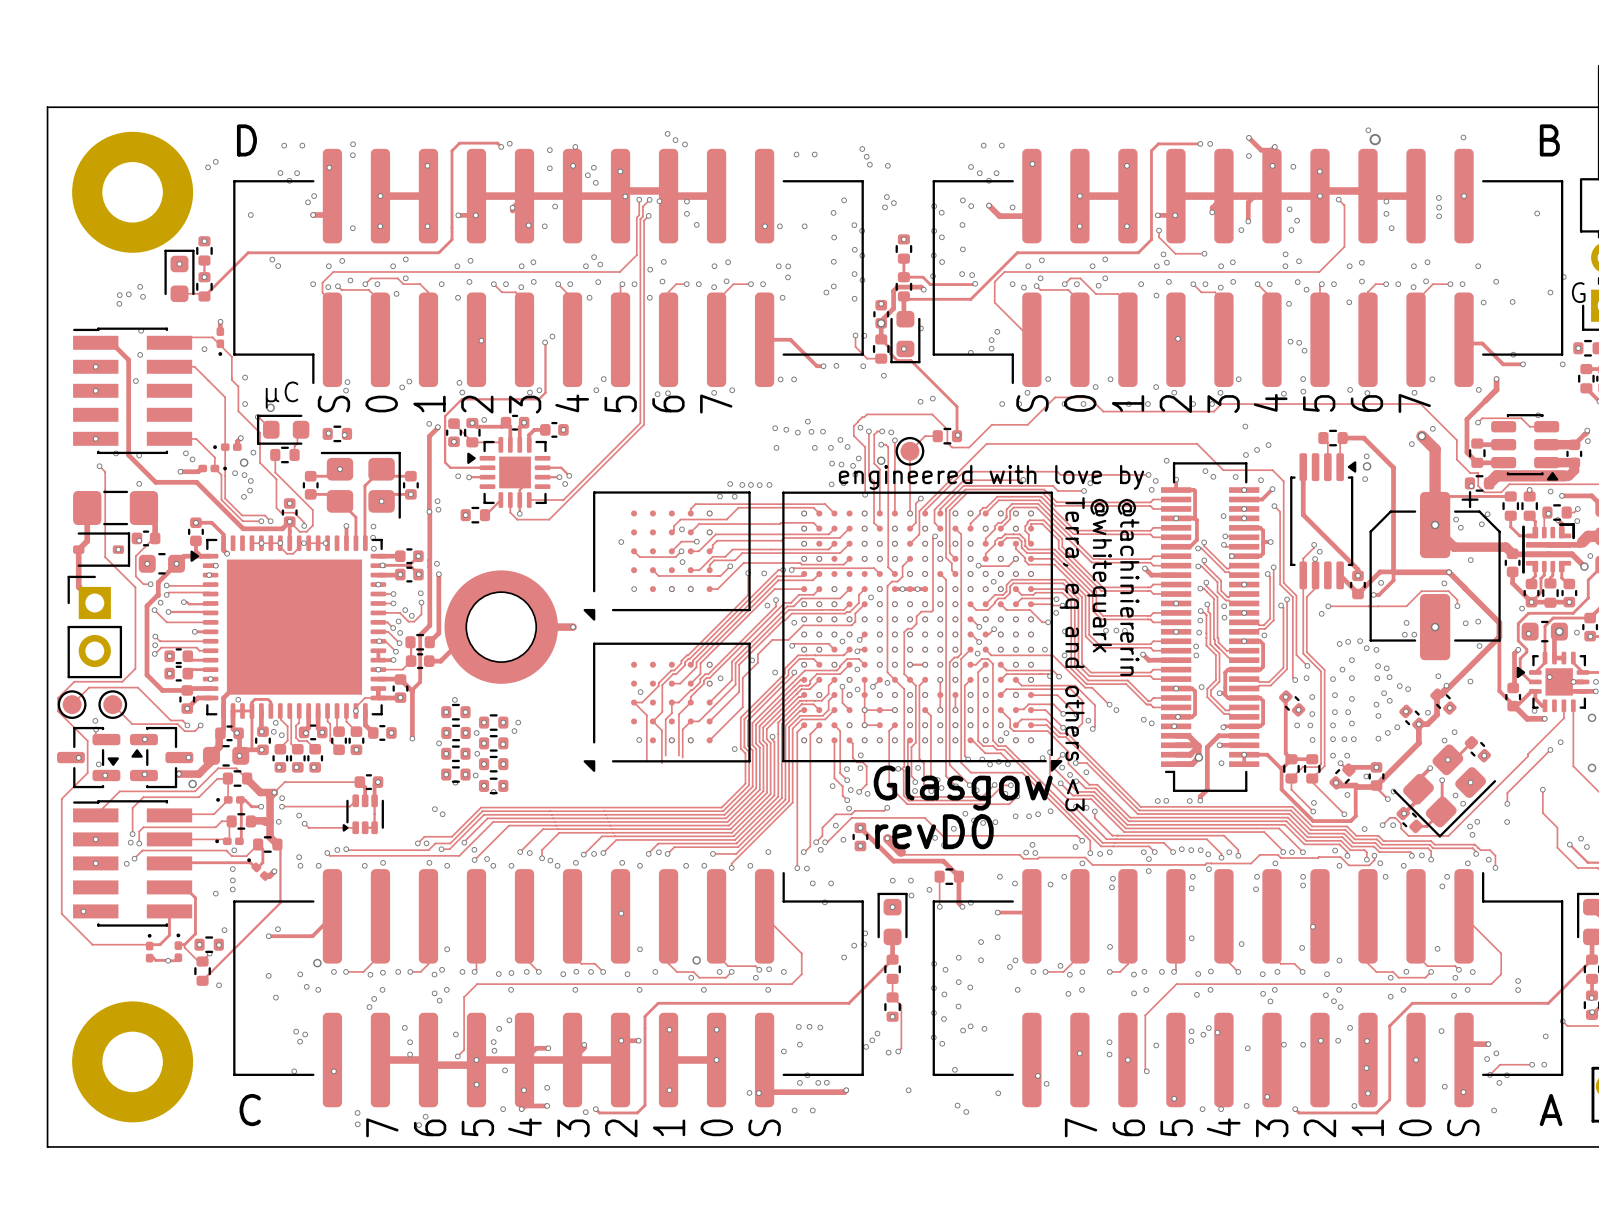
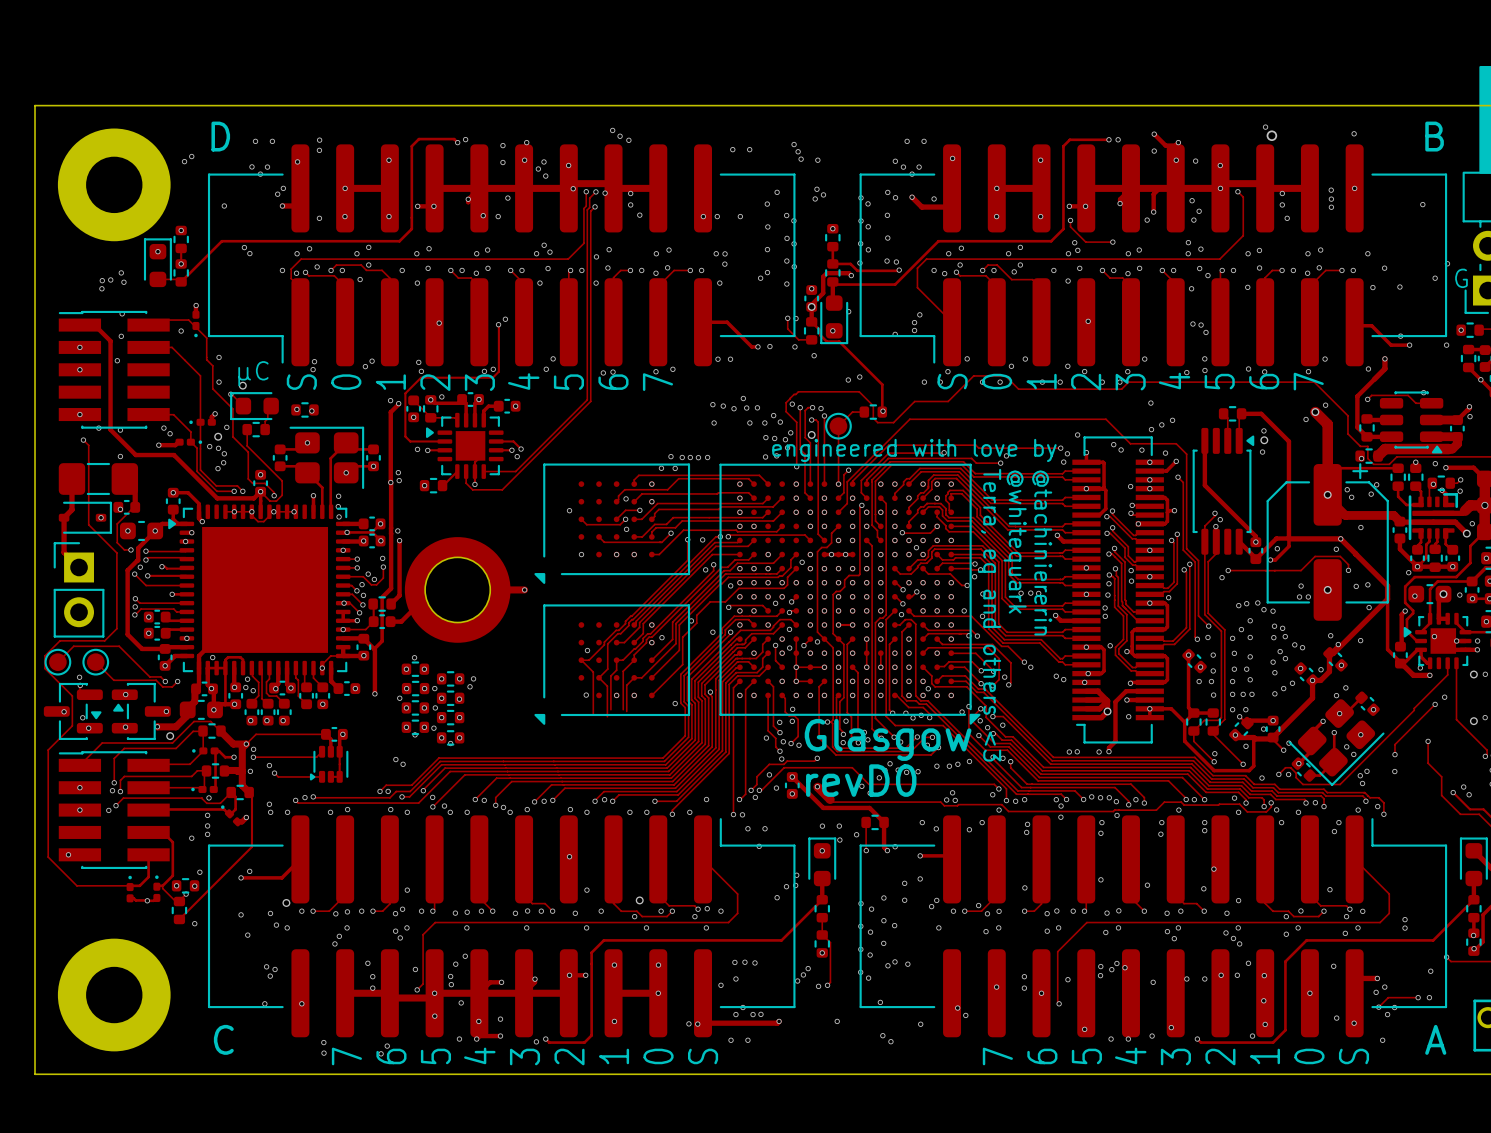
via: (864, 558) -> none

